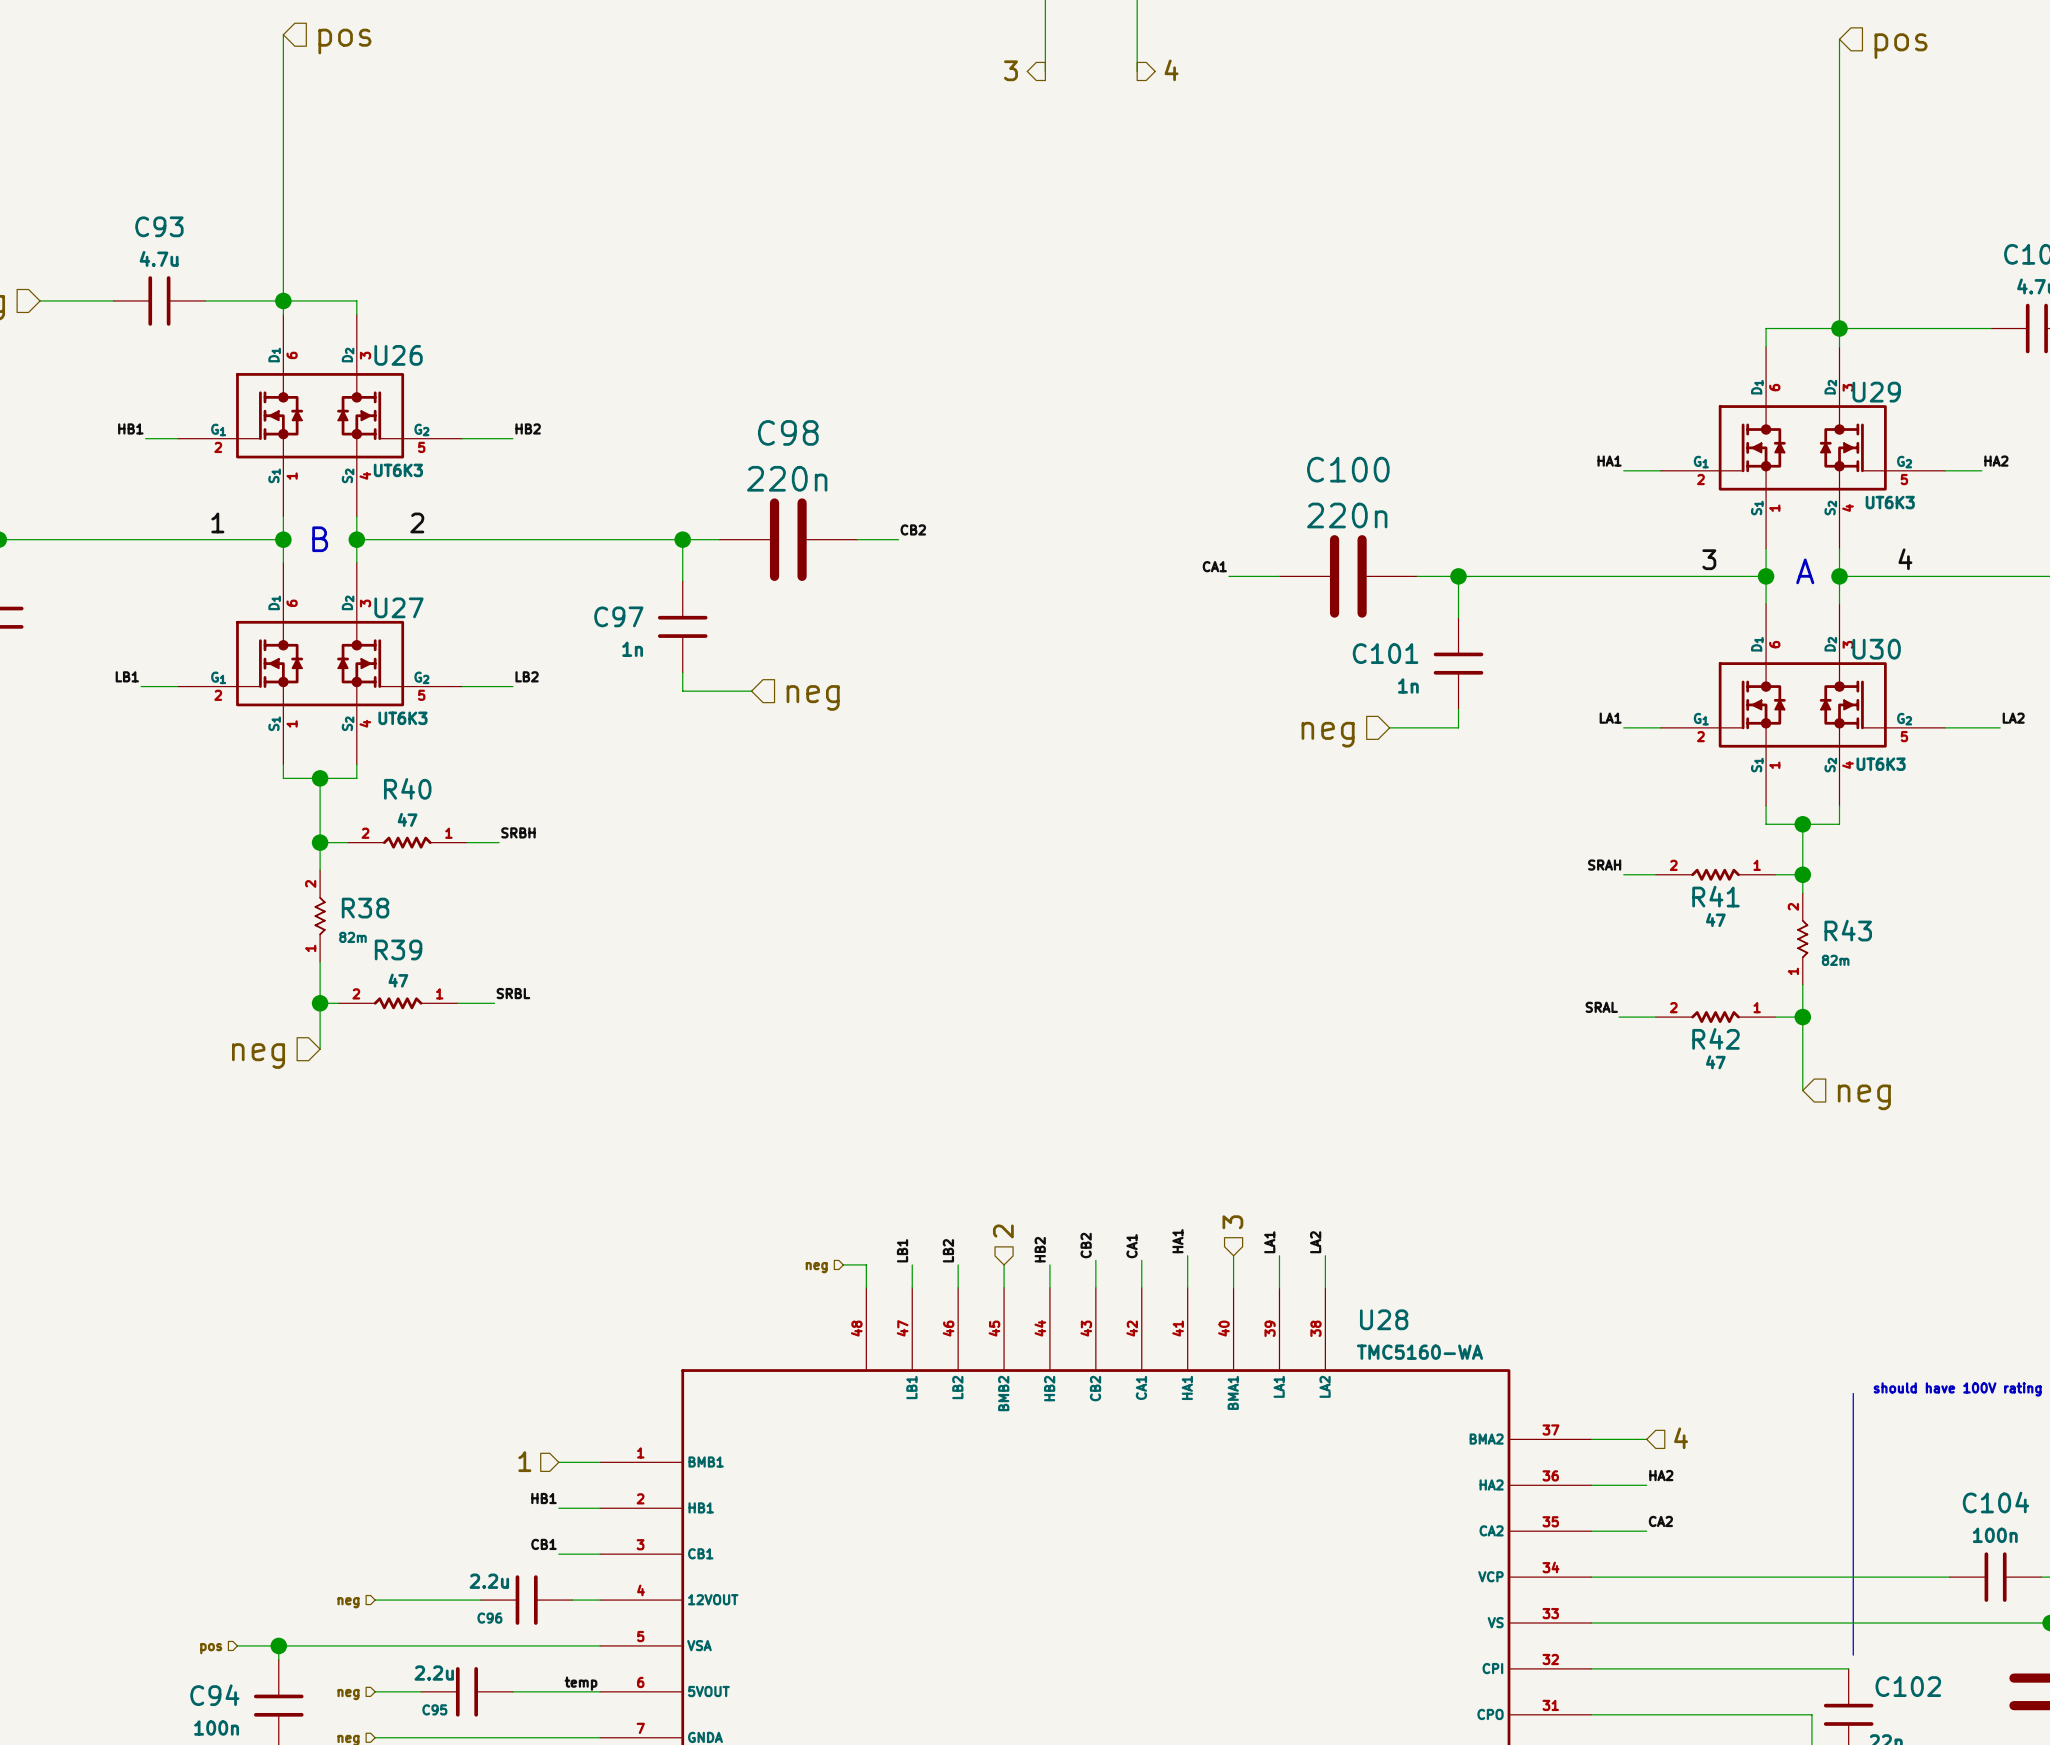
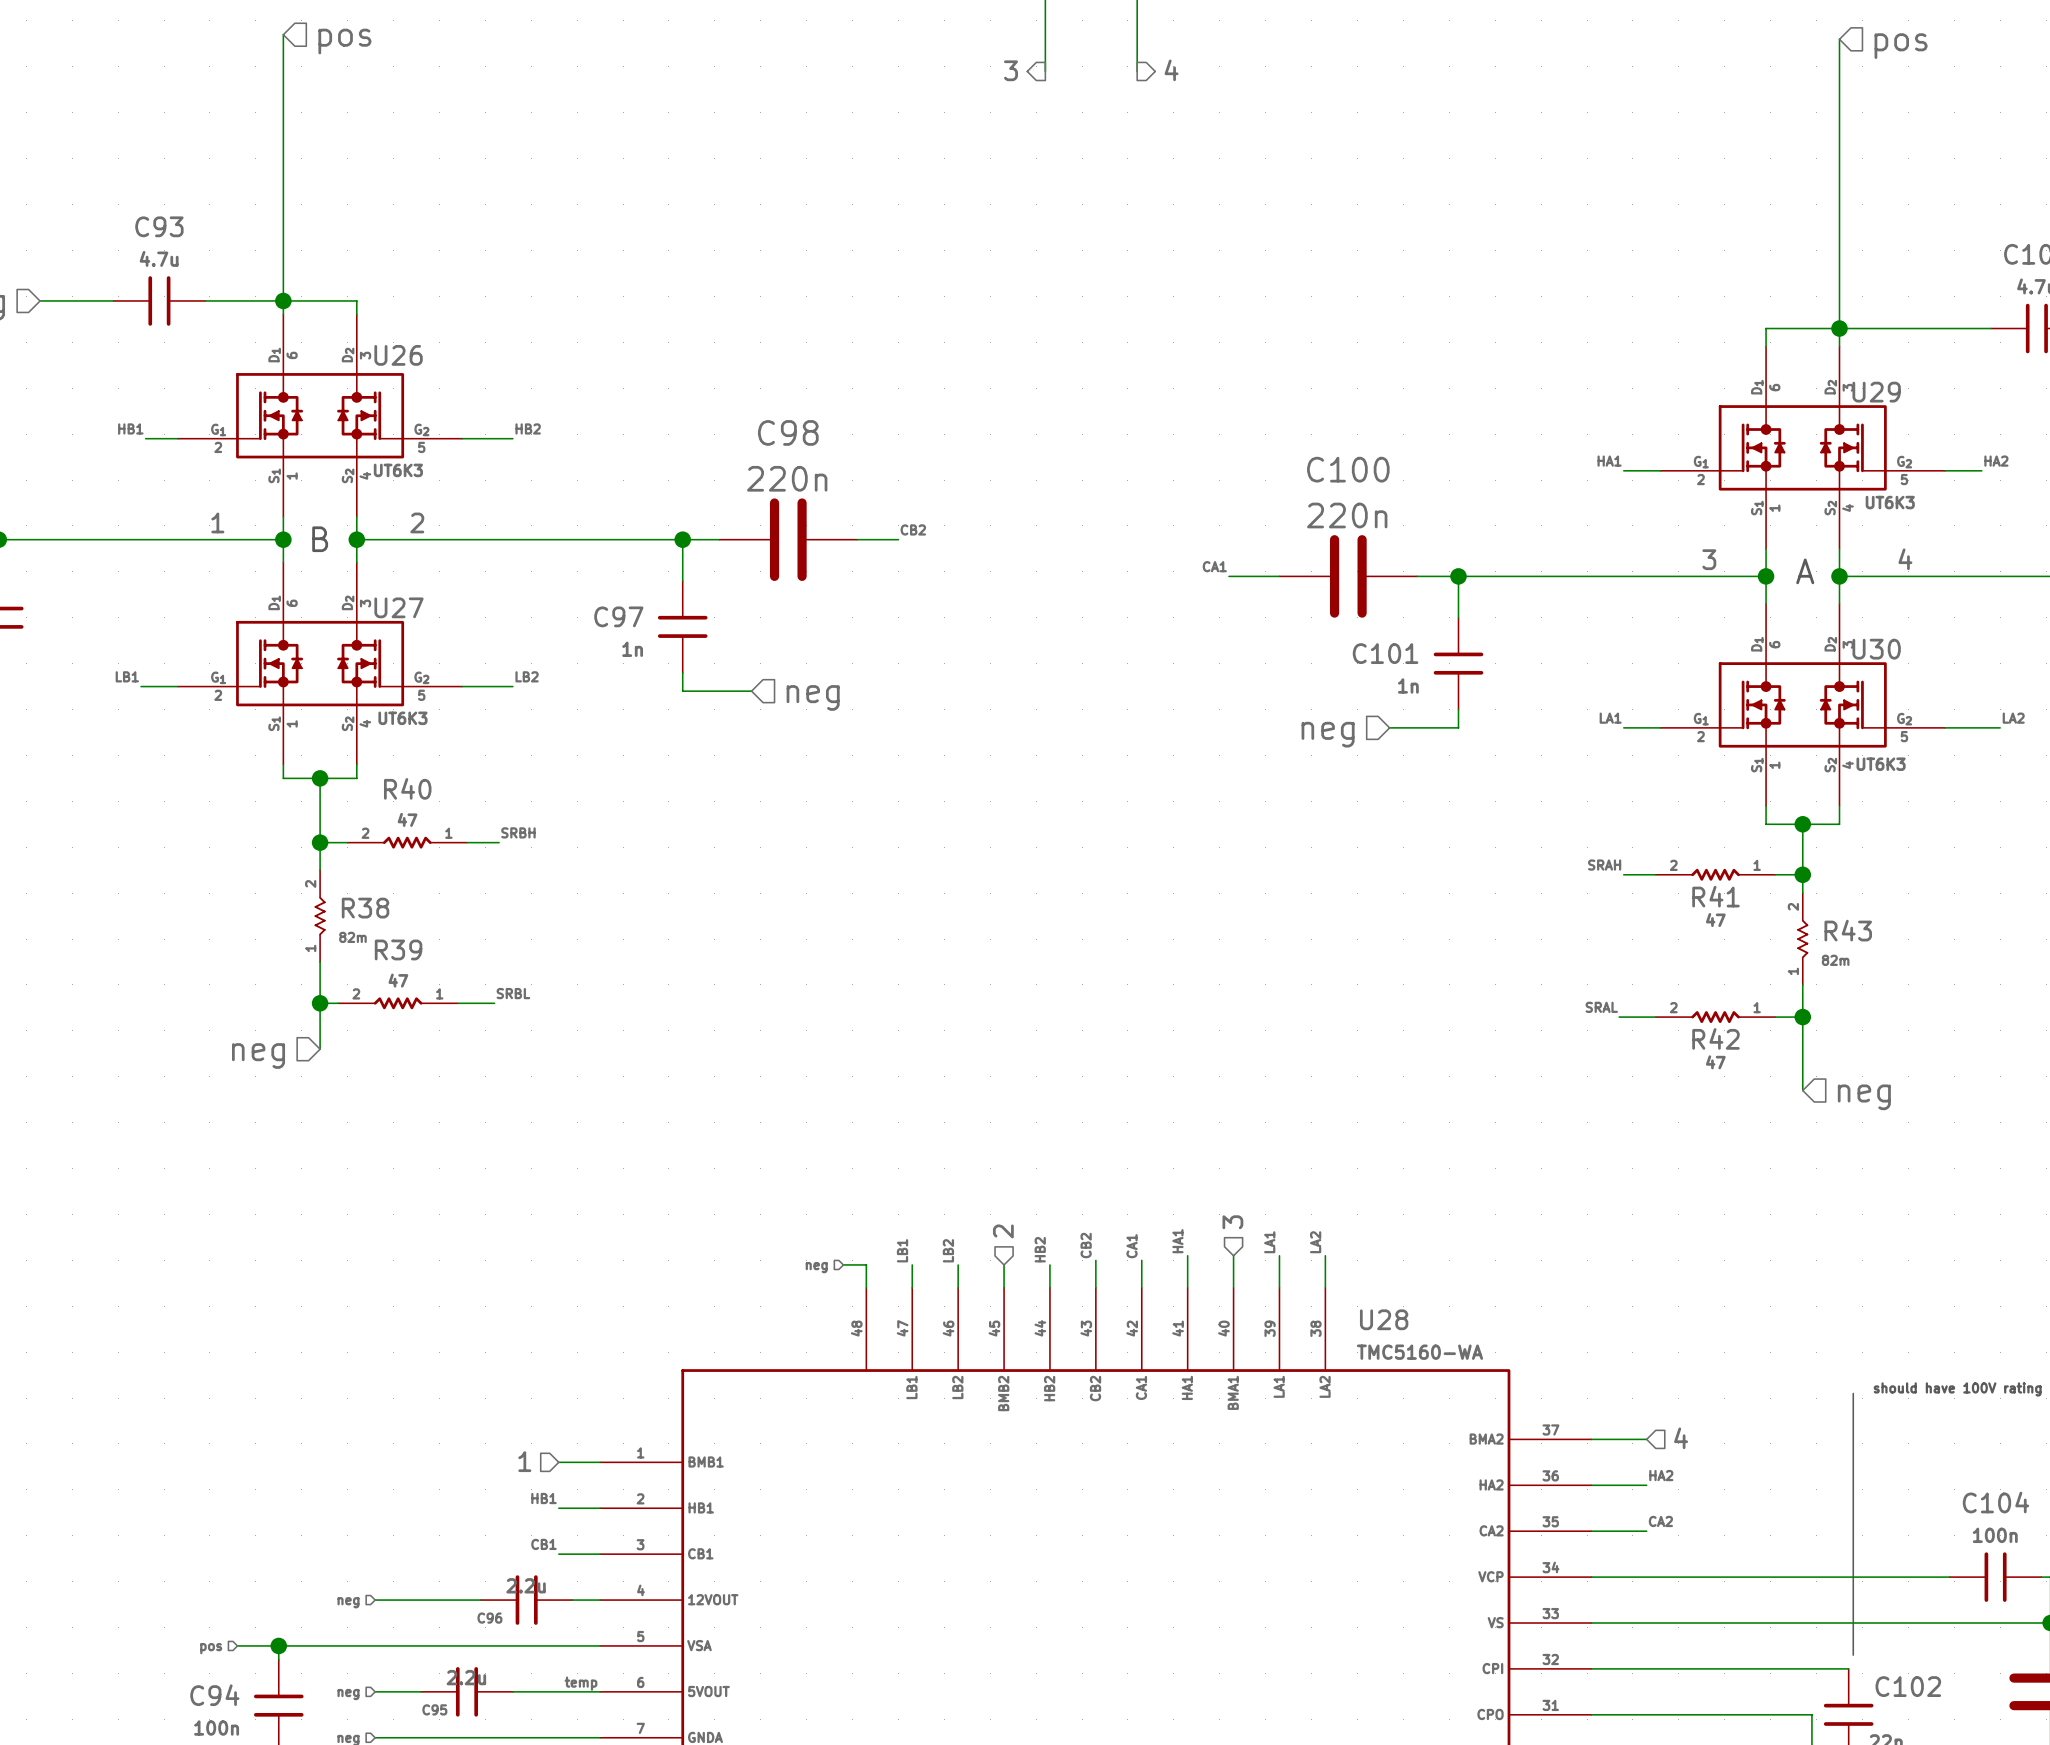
C96 value position: 2.2u (489, 1581) -> 2.2u (526, 1585)
C95 value position: 2.2u (434, 1673) -> 2.2u (466, 1677)

